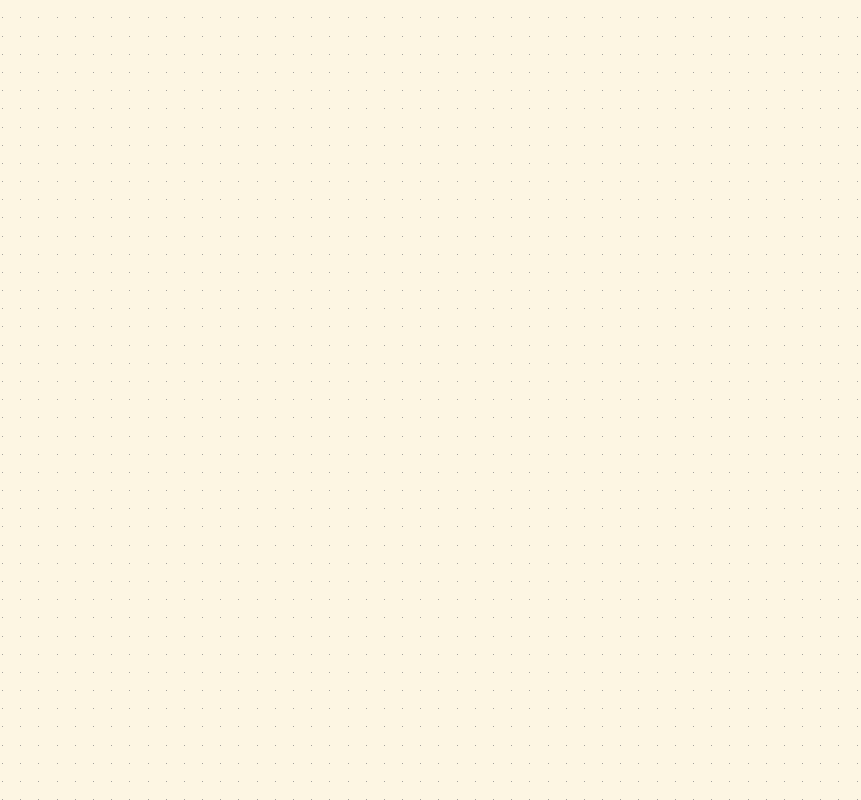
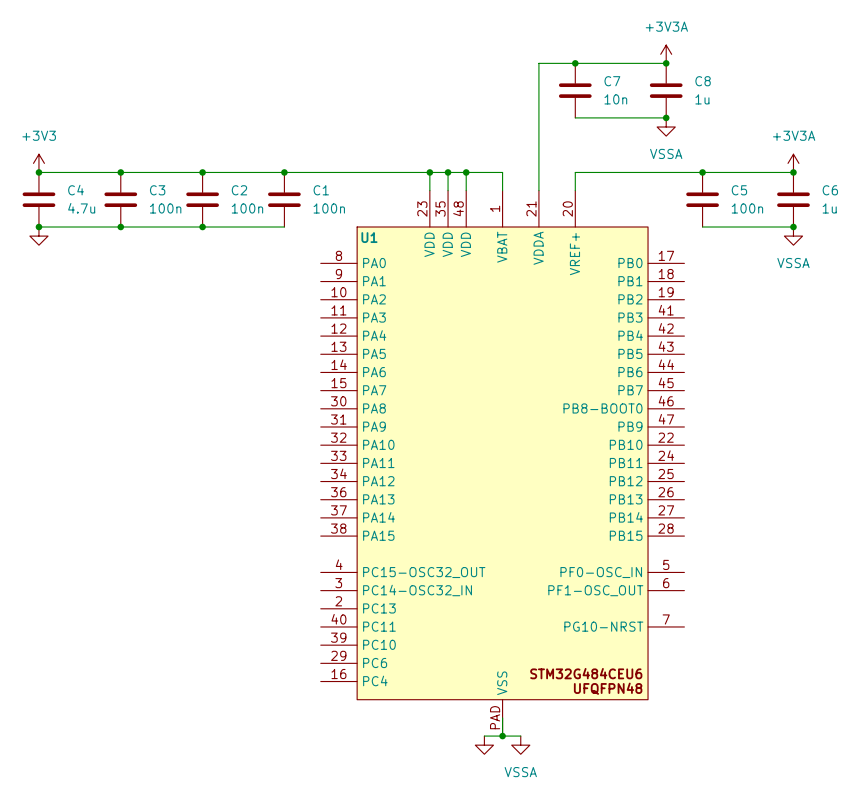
power symbol: none -> +3V3A (666, 54)
junction: none -> (575, 63)
wire: none -> (666, 63) (538, 63) (538, 190)
junction: none -> (666, 63)
C7: none -> 10n (575, 90)
C8: none -> 1u (666, 90)
wire: none -> (575, 117) (666, 117)
junction: none -> (666, 117)
power symbol: none -> VSSA (666, 127)
power symbol: none -> +3V3 (38, 163)
power symbol: none -> +3V3A (793, 163)
wire: none -> (38, 172) (502, 172) (502, 190)
junction: none -> (38, 172)
junction: none -> (120, 172)
junction: none -> (202, 172)
junction: none -> (284, 172)
wire: none -> (429, 172) (429, 190)
junction: none -> (429, 172)
wire: none -> (448, 172) (448, 190)
junction: none -> (448, 172)
wire: none -> (466, 172) (466, 190)
junction: none -> (466, 172)
junction: none -> (702, 172)
wire: none -> (793, 172) (575, 172) (575, 190)
junction: none -> (793, 172)
C4: none -> 4.7u (38, 199)
C3: none -> 100n (120, 199)
C2: none -> 100n (202, 199)
C1: none -> 100n (284, 199)
C5: none -> 100n (702, 199)
C6: none -> 1u (793, 199)
wire: none -> (38, 227) (284, 227)
junction: none -> (38, 227)
junction: none -> (120, 227)
junction: none -> (202, 227)
wire: none -> (702, 227) (793, 227)
junction: none -> (793, 227)
power symbol: none -> (38, 236)
power symbol: none -> VSSA (793, 236)
U1: none -> (502, 463)
wire: none -> (502, 717) (502, 736)
wire: none -> (484, 736) (520, 736)
junction: none -> (502, 736)
power symbol: none -> (484, 745)
power symbol: none -> VSSA (520, 745)

